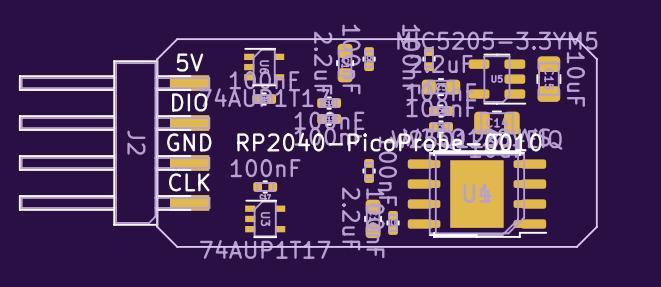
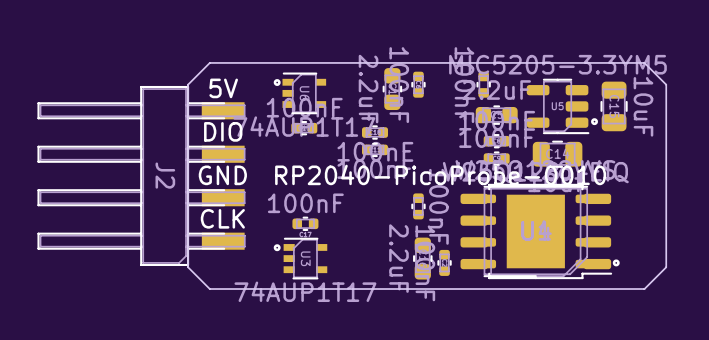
drawing: none -> [273, 79, 281, 86]
drawing: none -> [591, 118, 598, 126]
drawing: none -> [273, 244, 281, 252]
drawing: none -> [612, 259, 620, 267]

